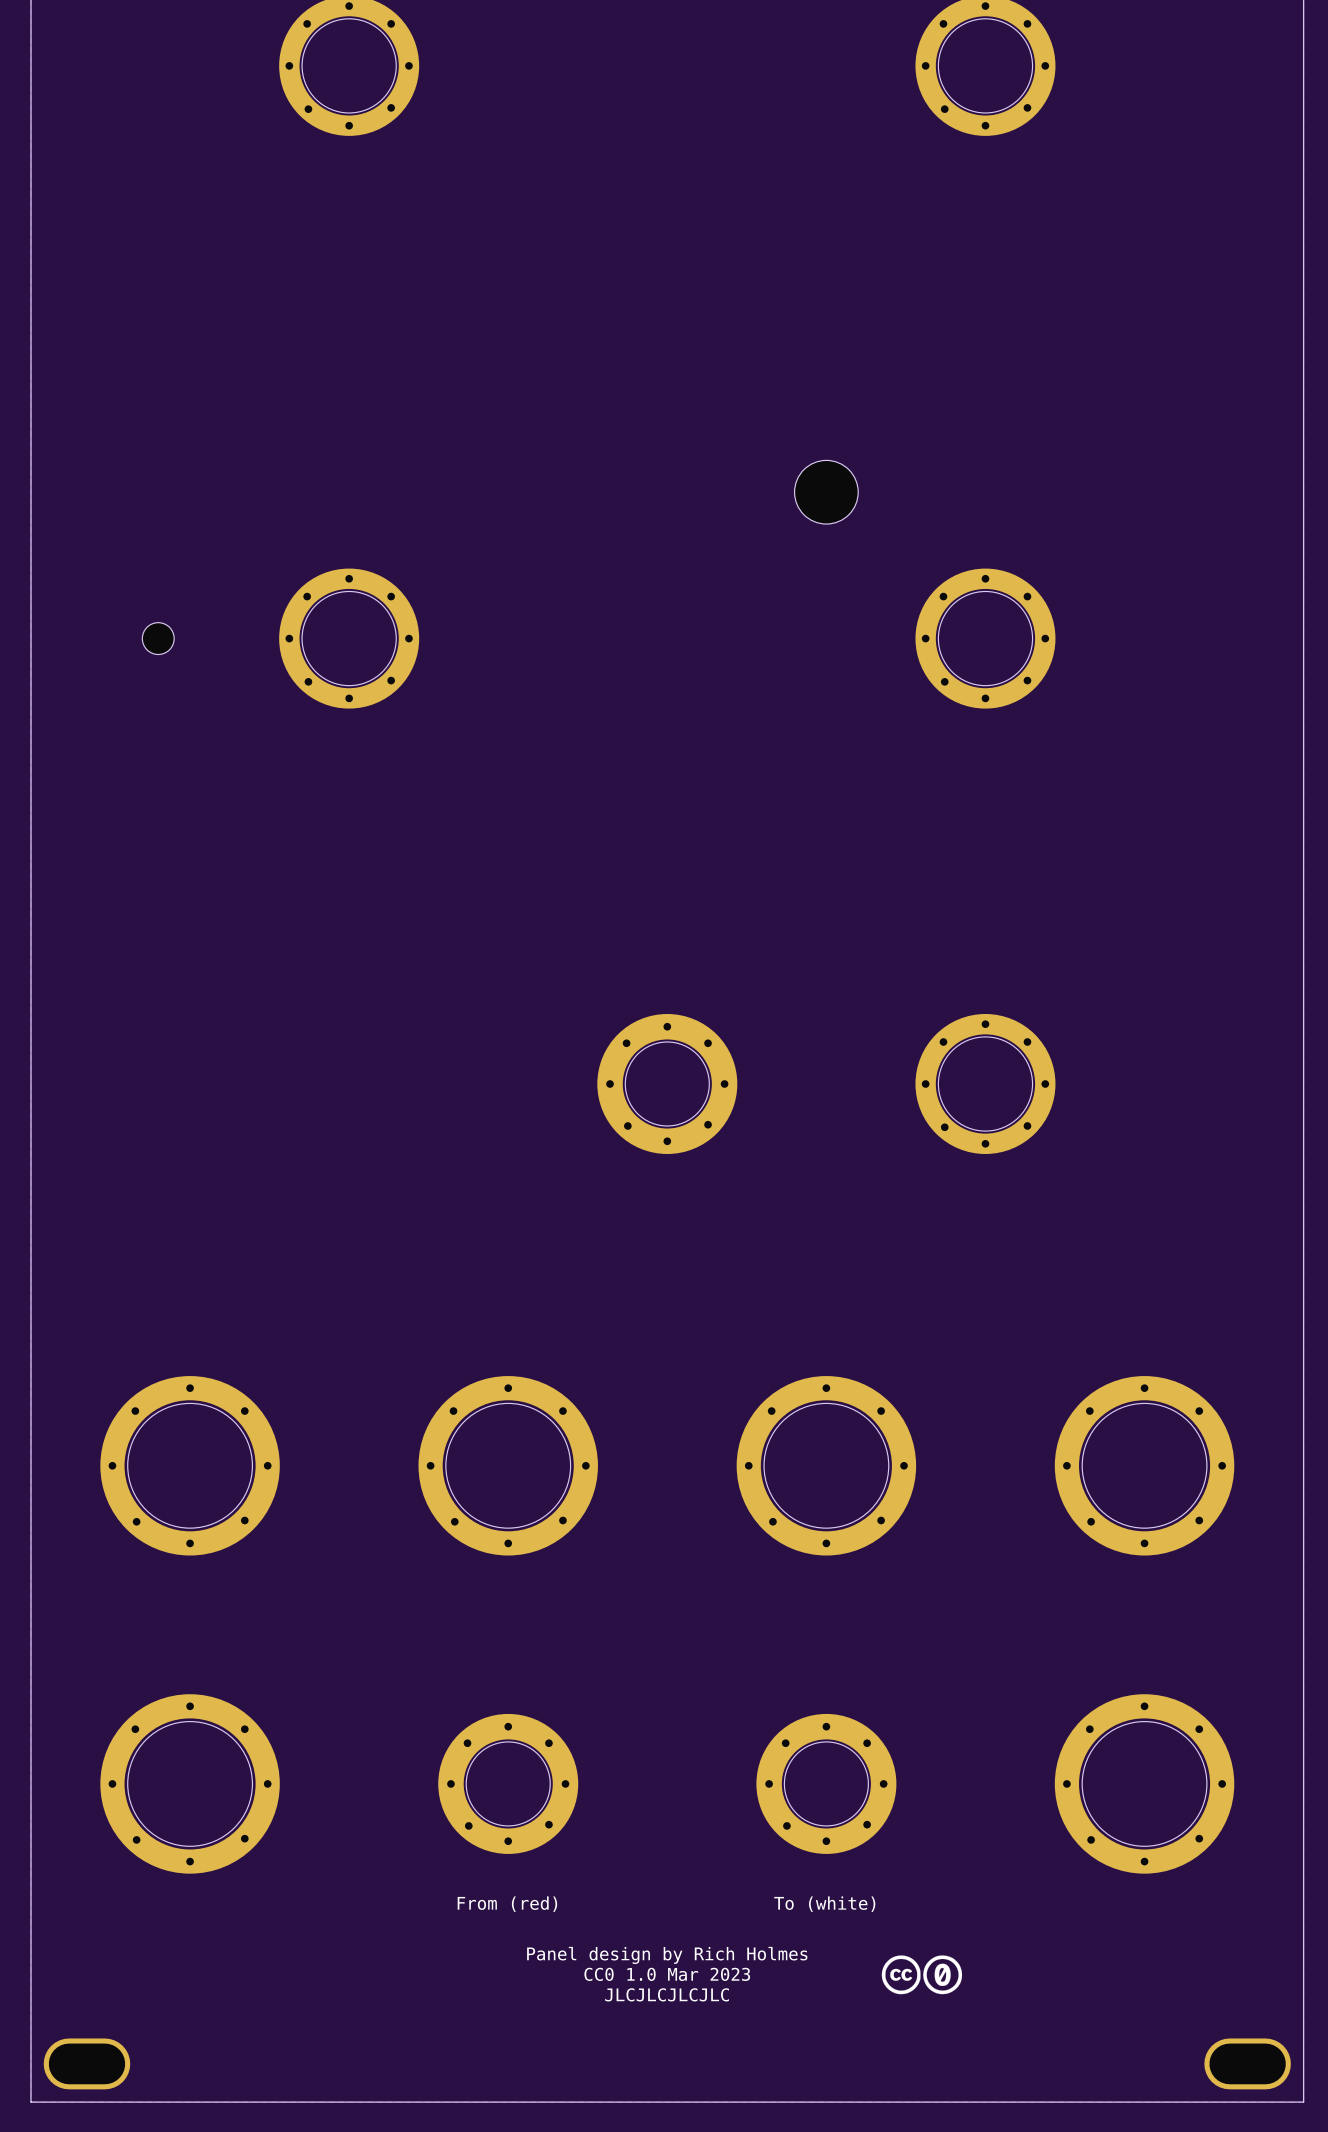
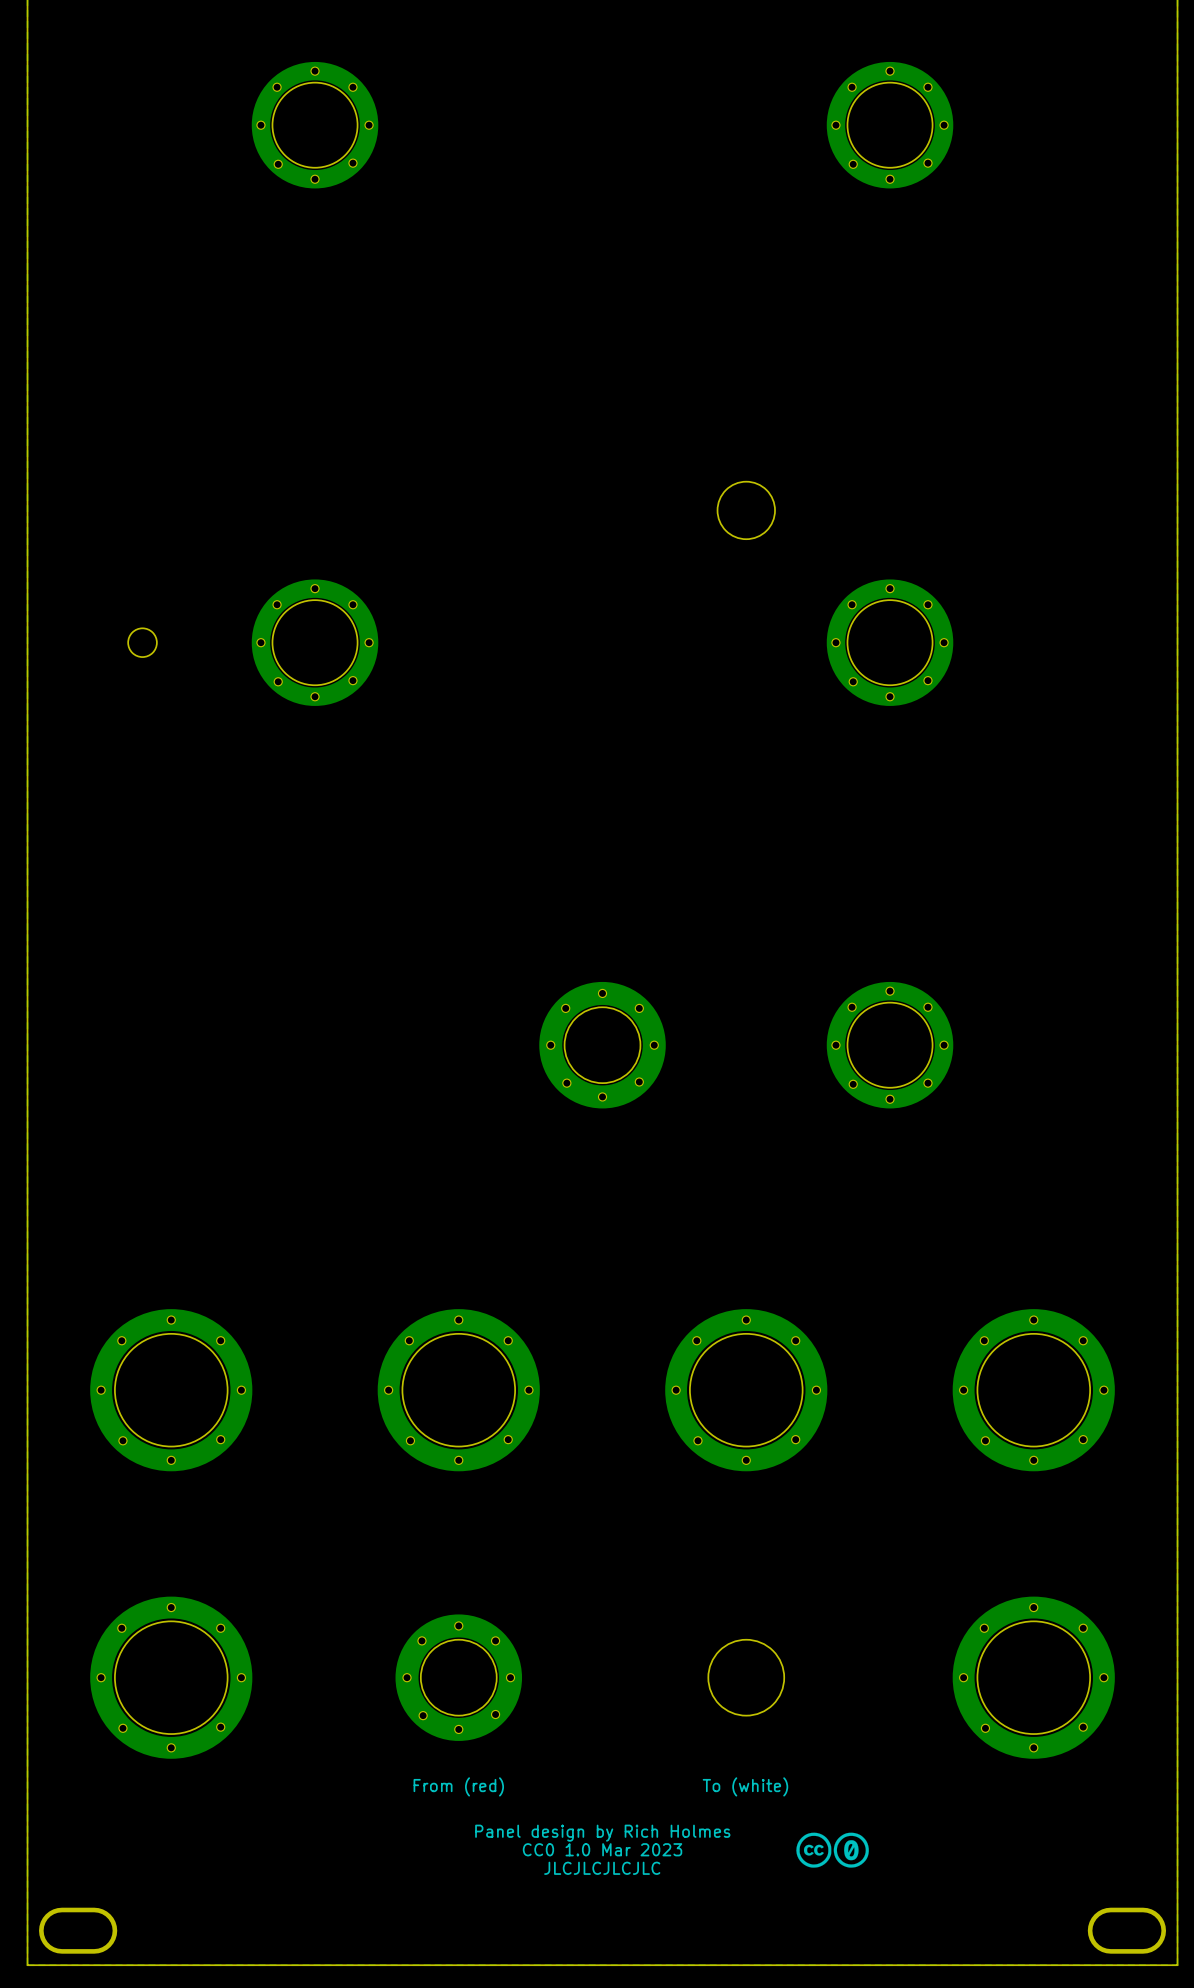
drawing: none -> [708, 1639, 785, 1716]
part: (826, 1783) -> none

